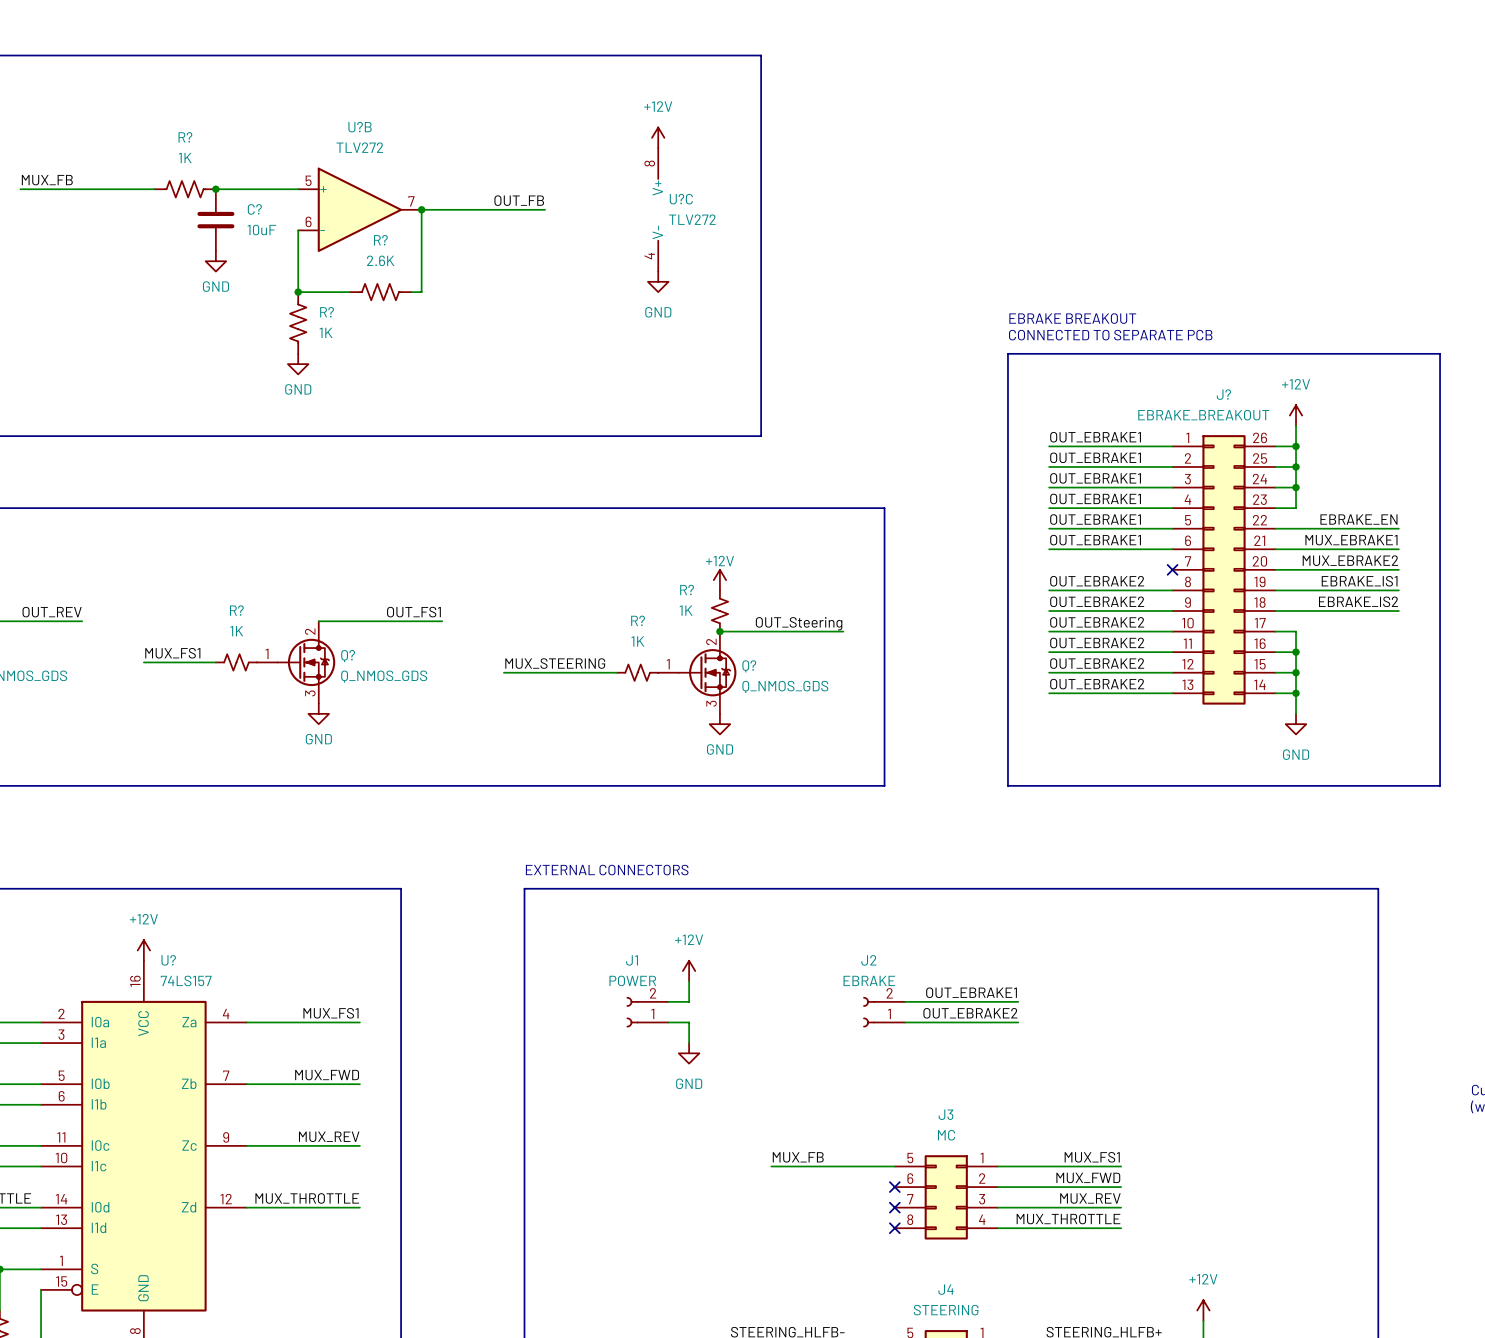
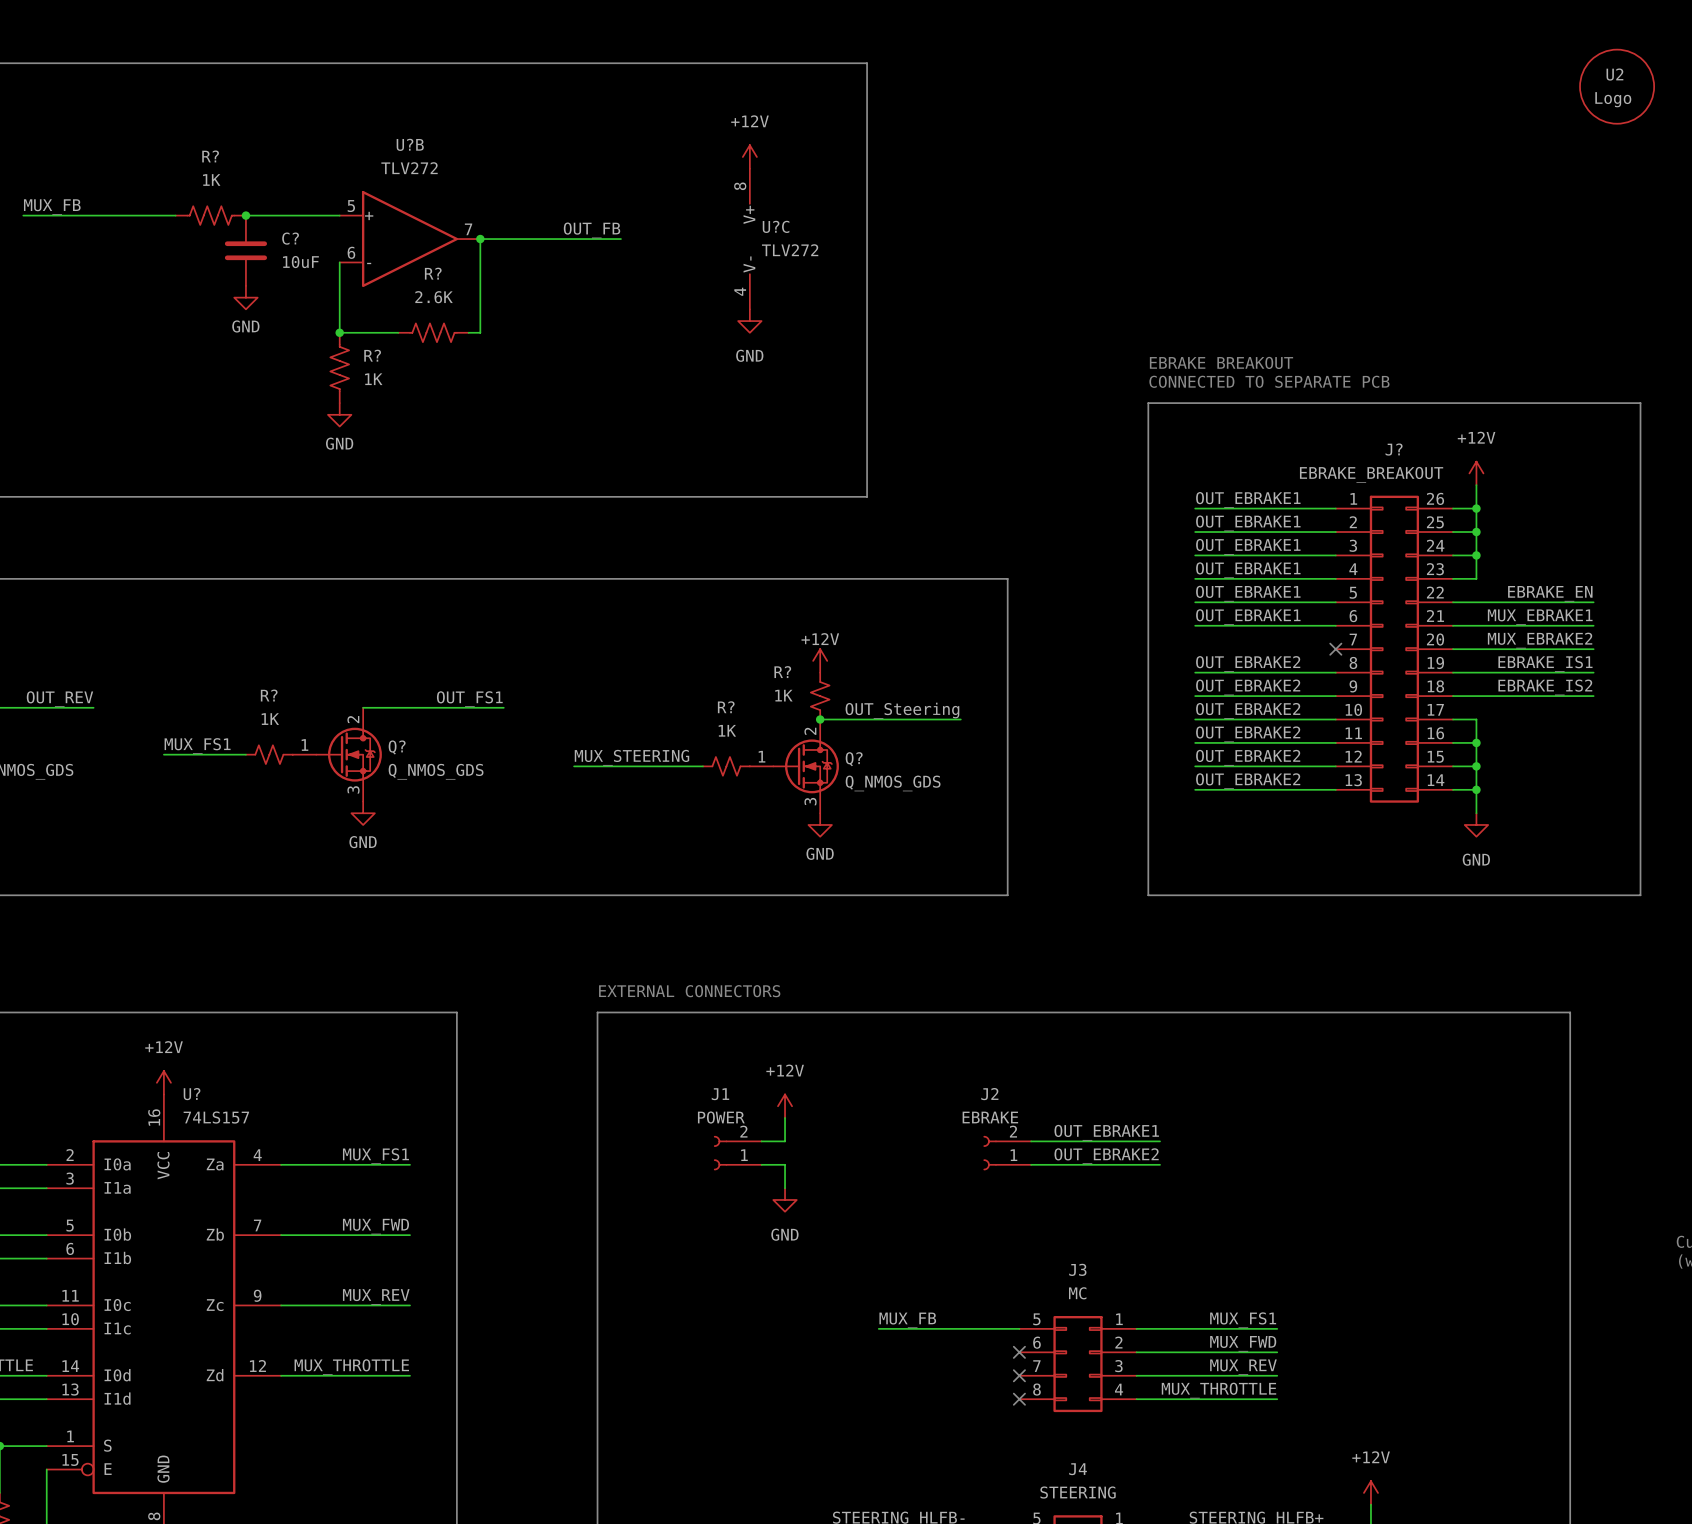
U2: none -> Logo (1617, 86)

